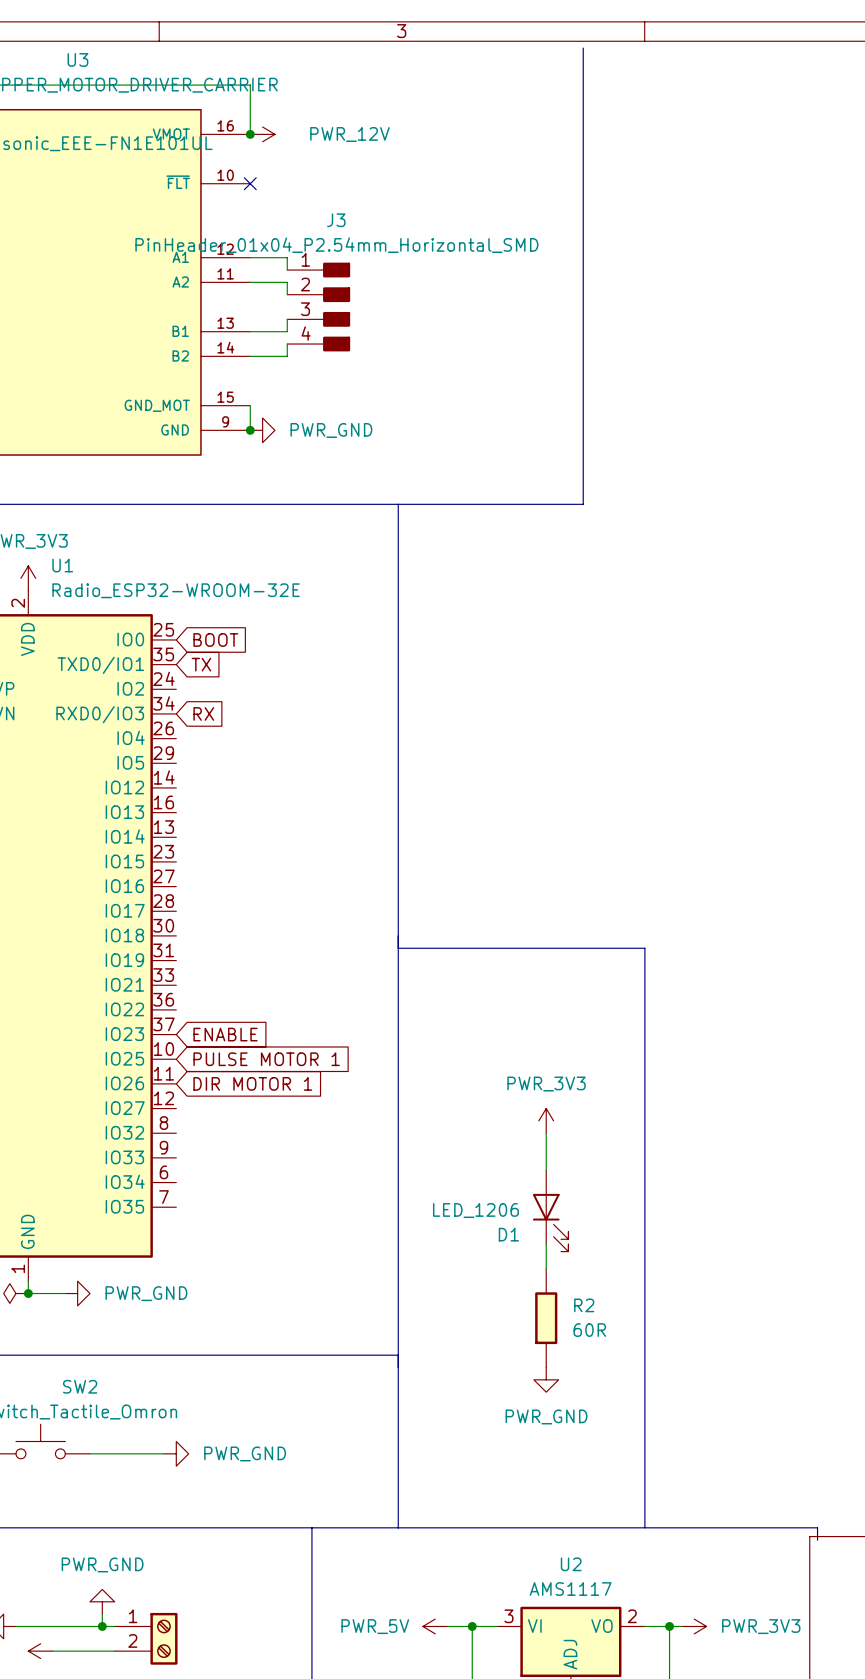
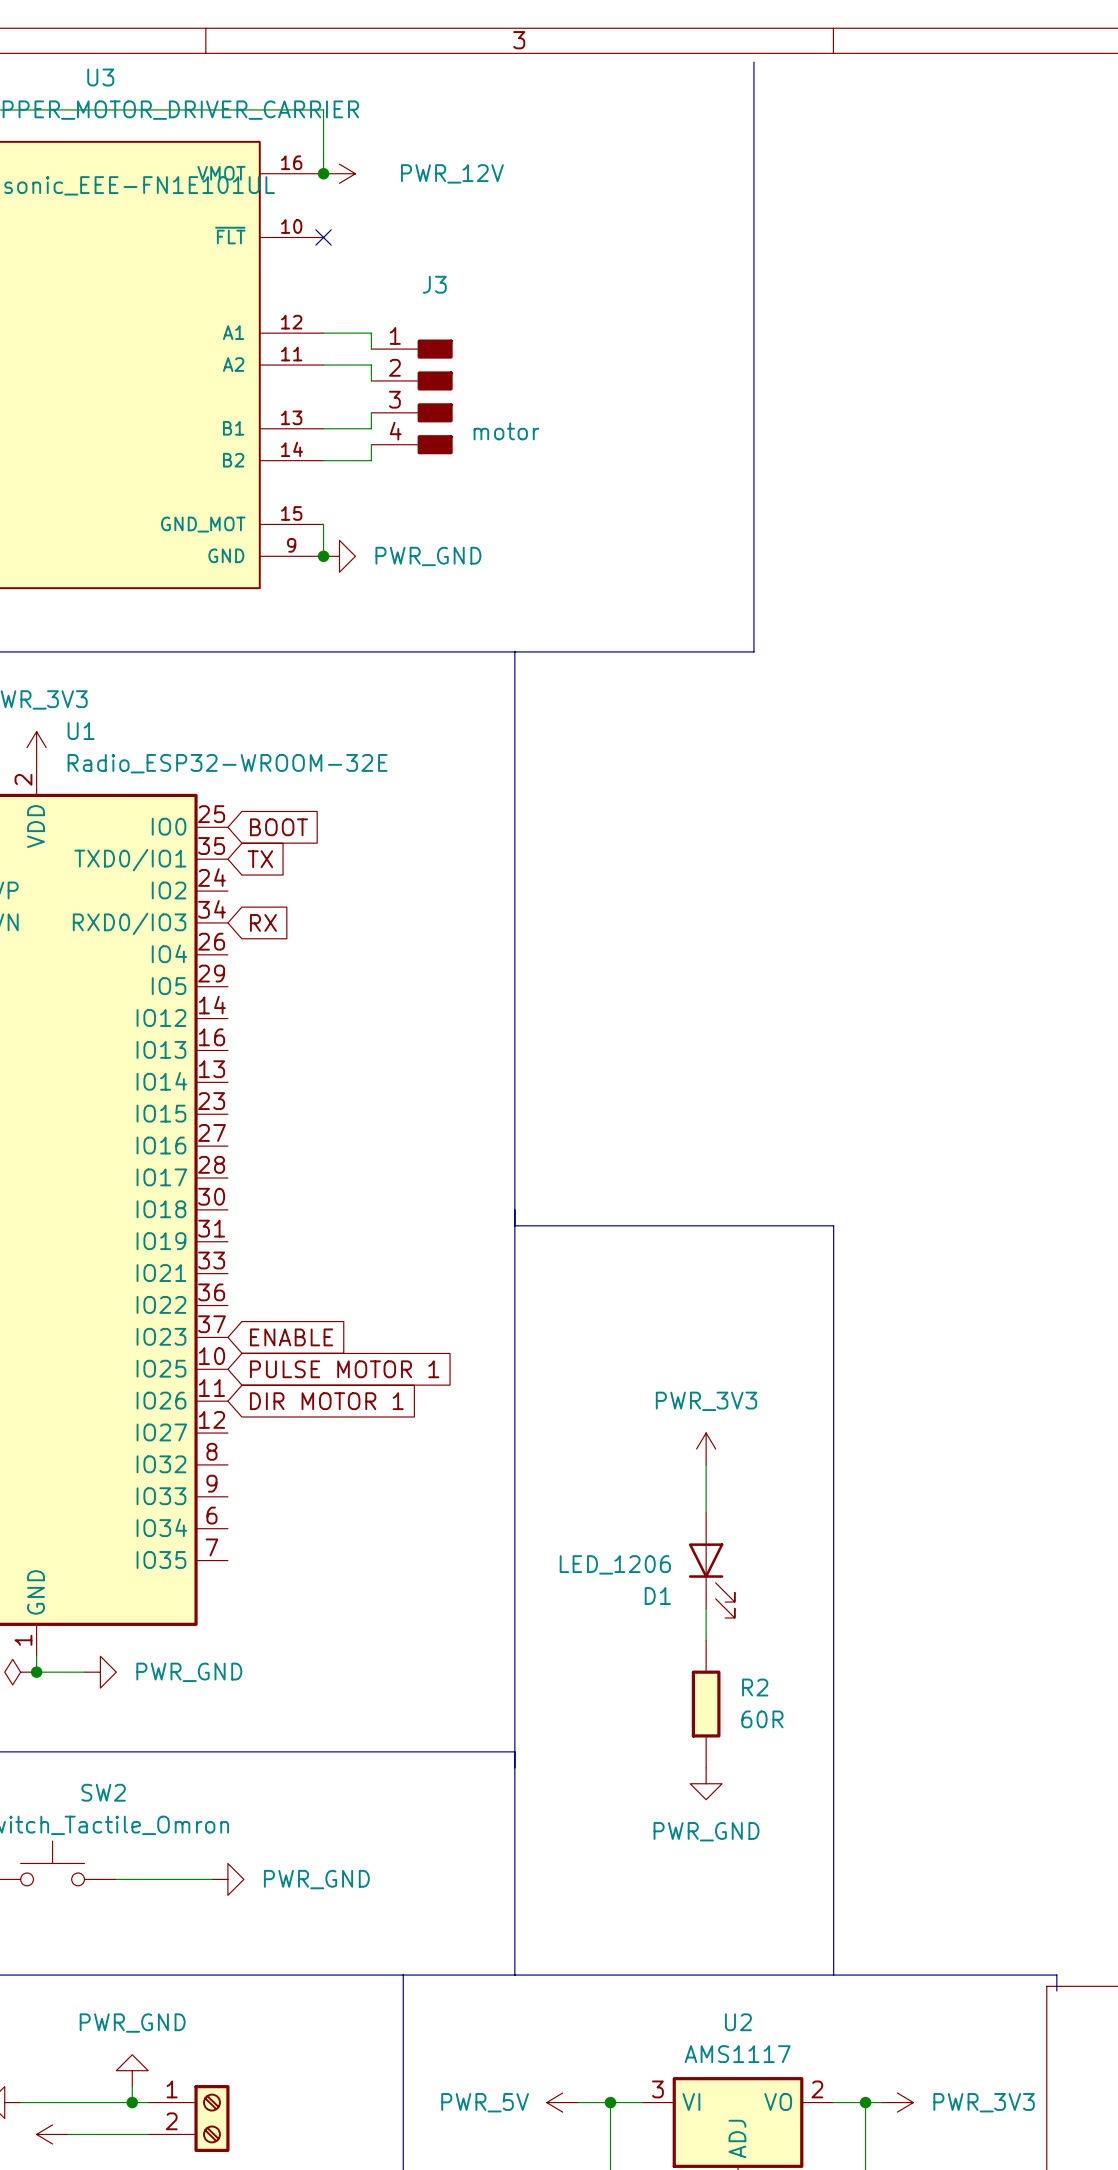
J3 value: PinHeader_01x04_P2.54mm_Horizontal_SMD (336, 245) -> motor (506, 431)

